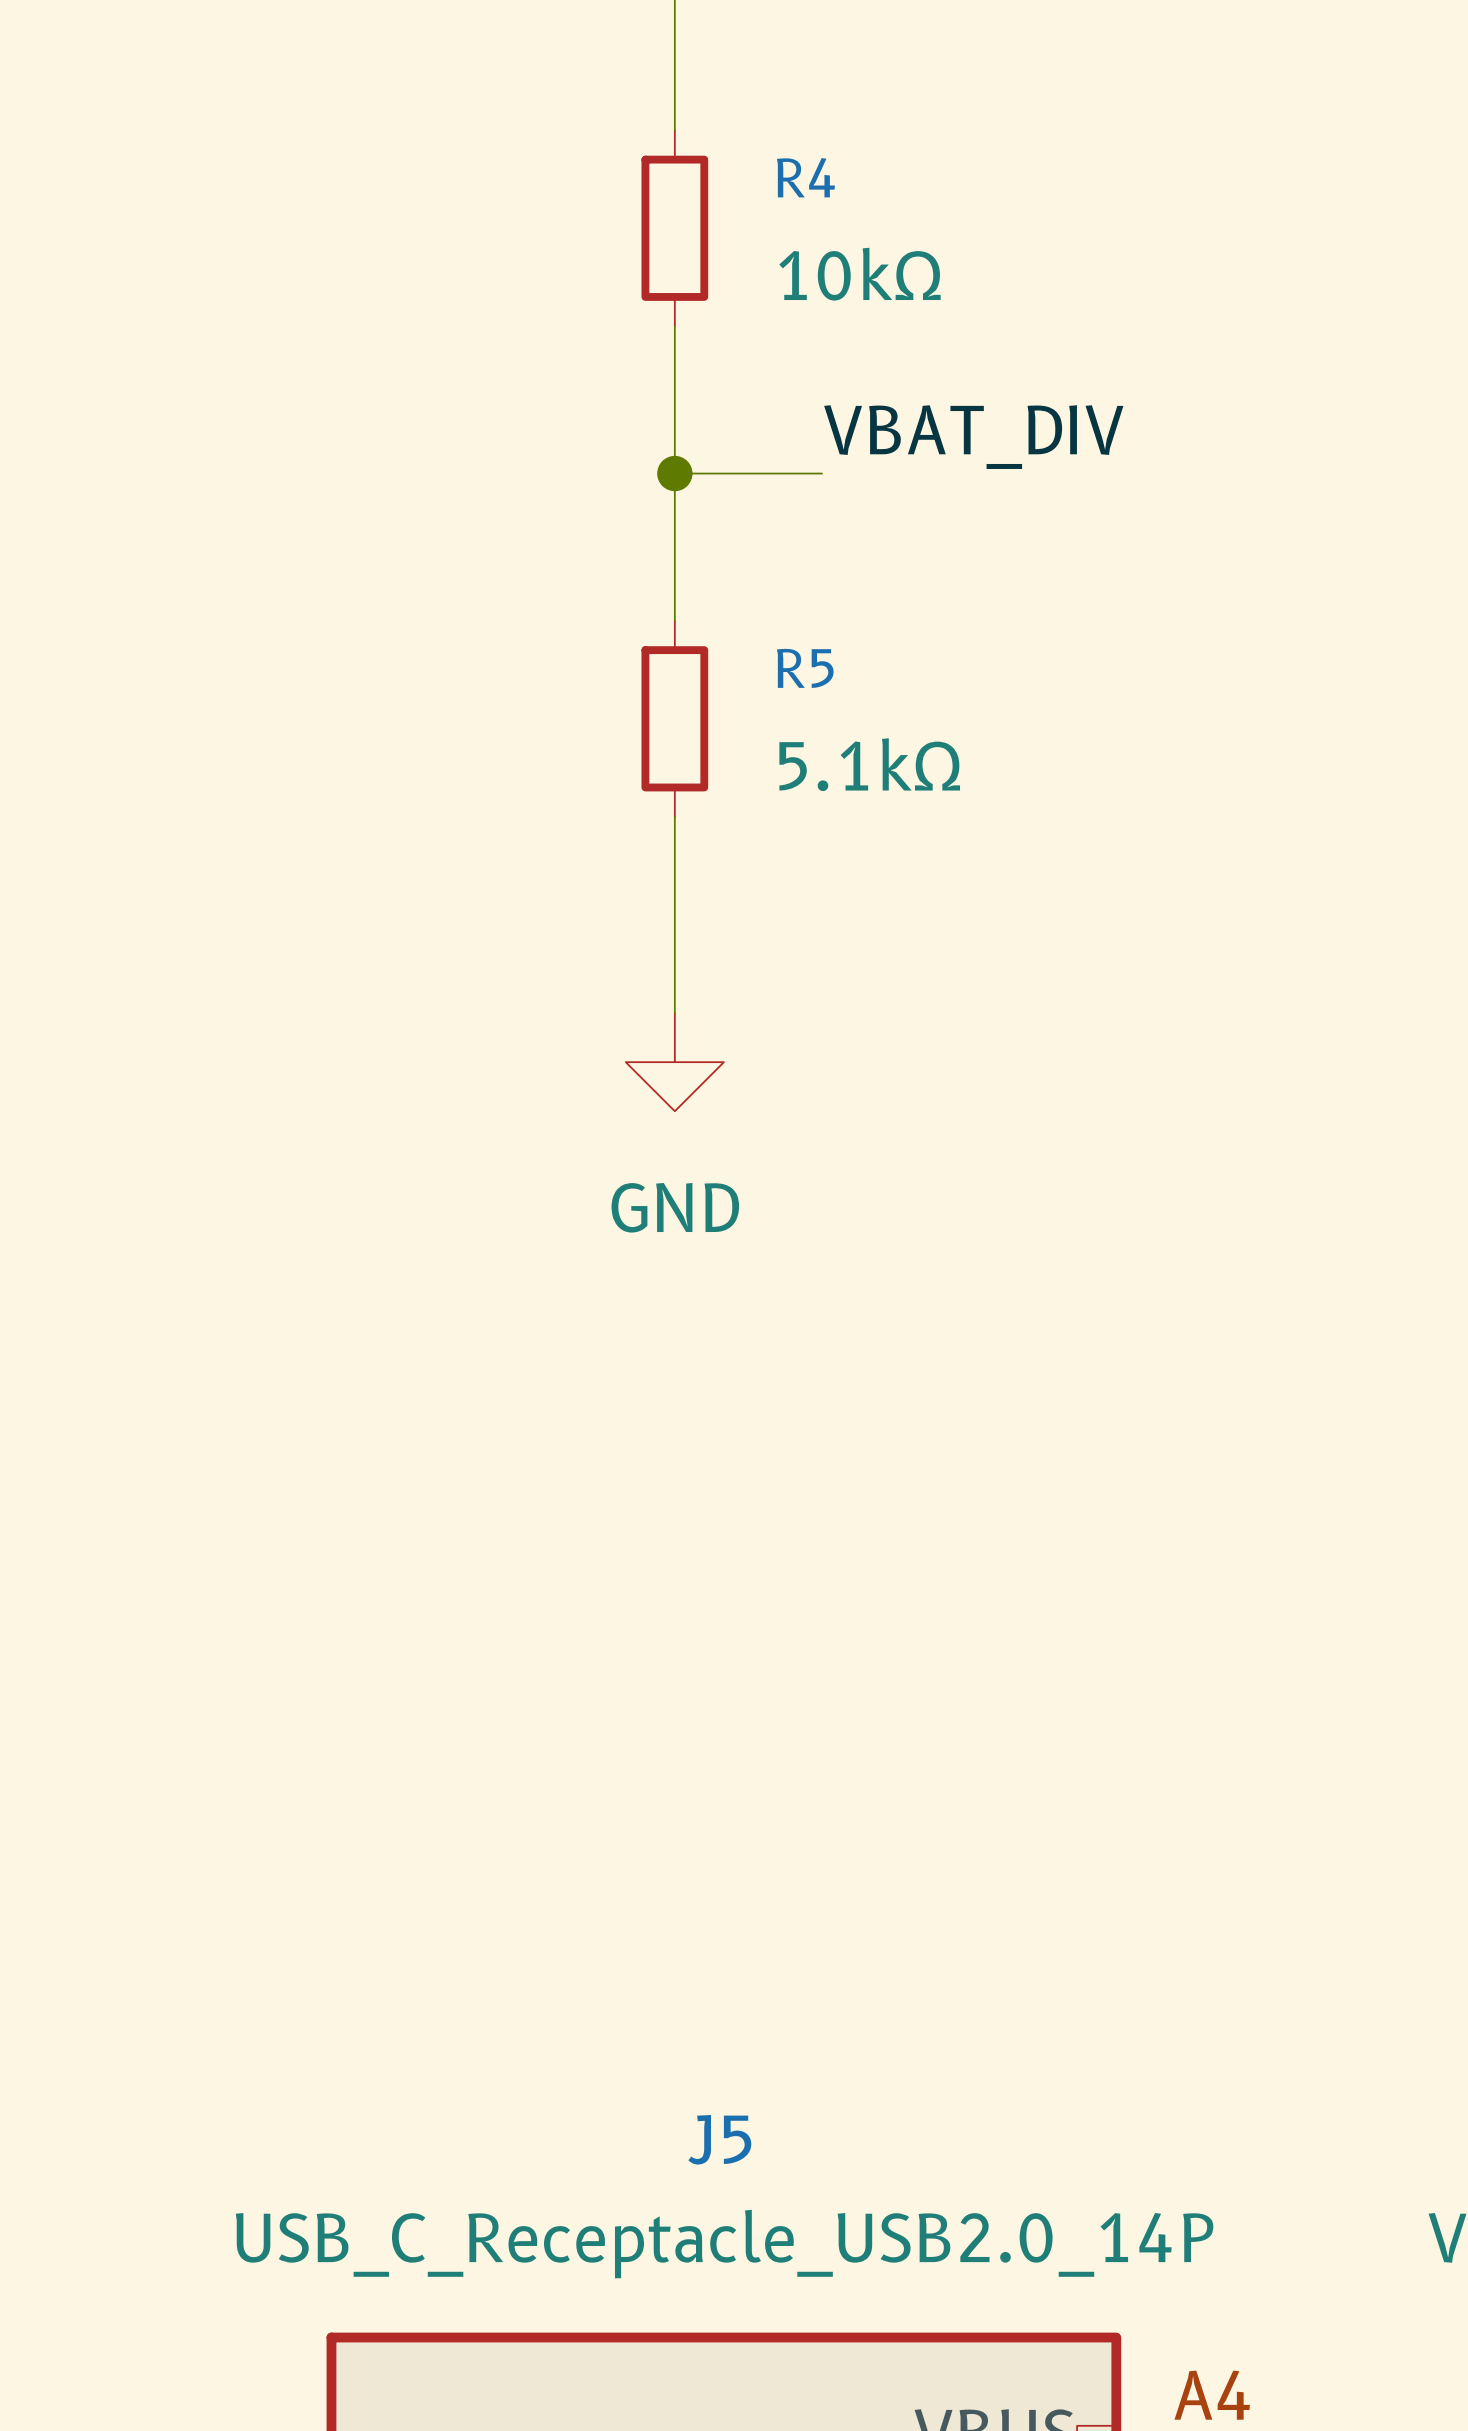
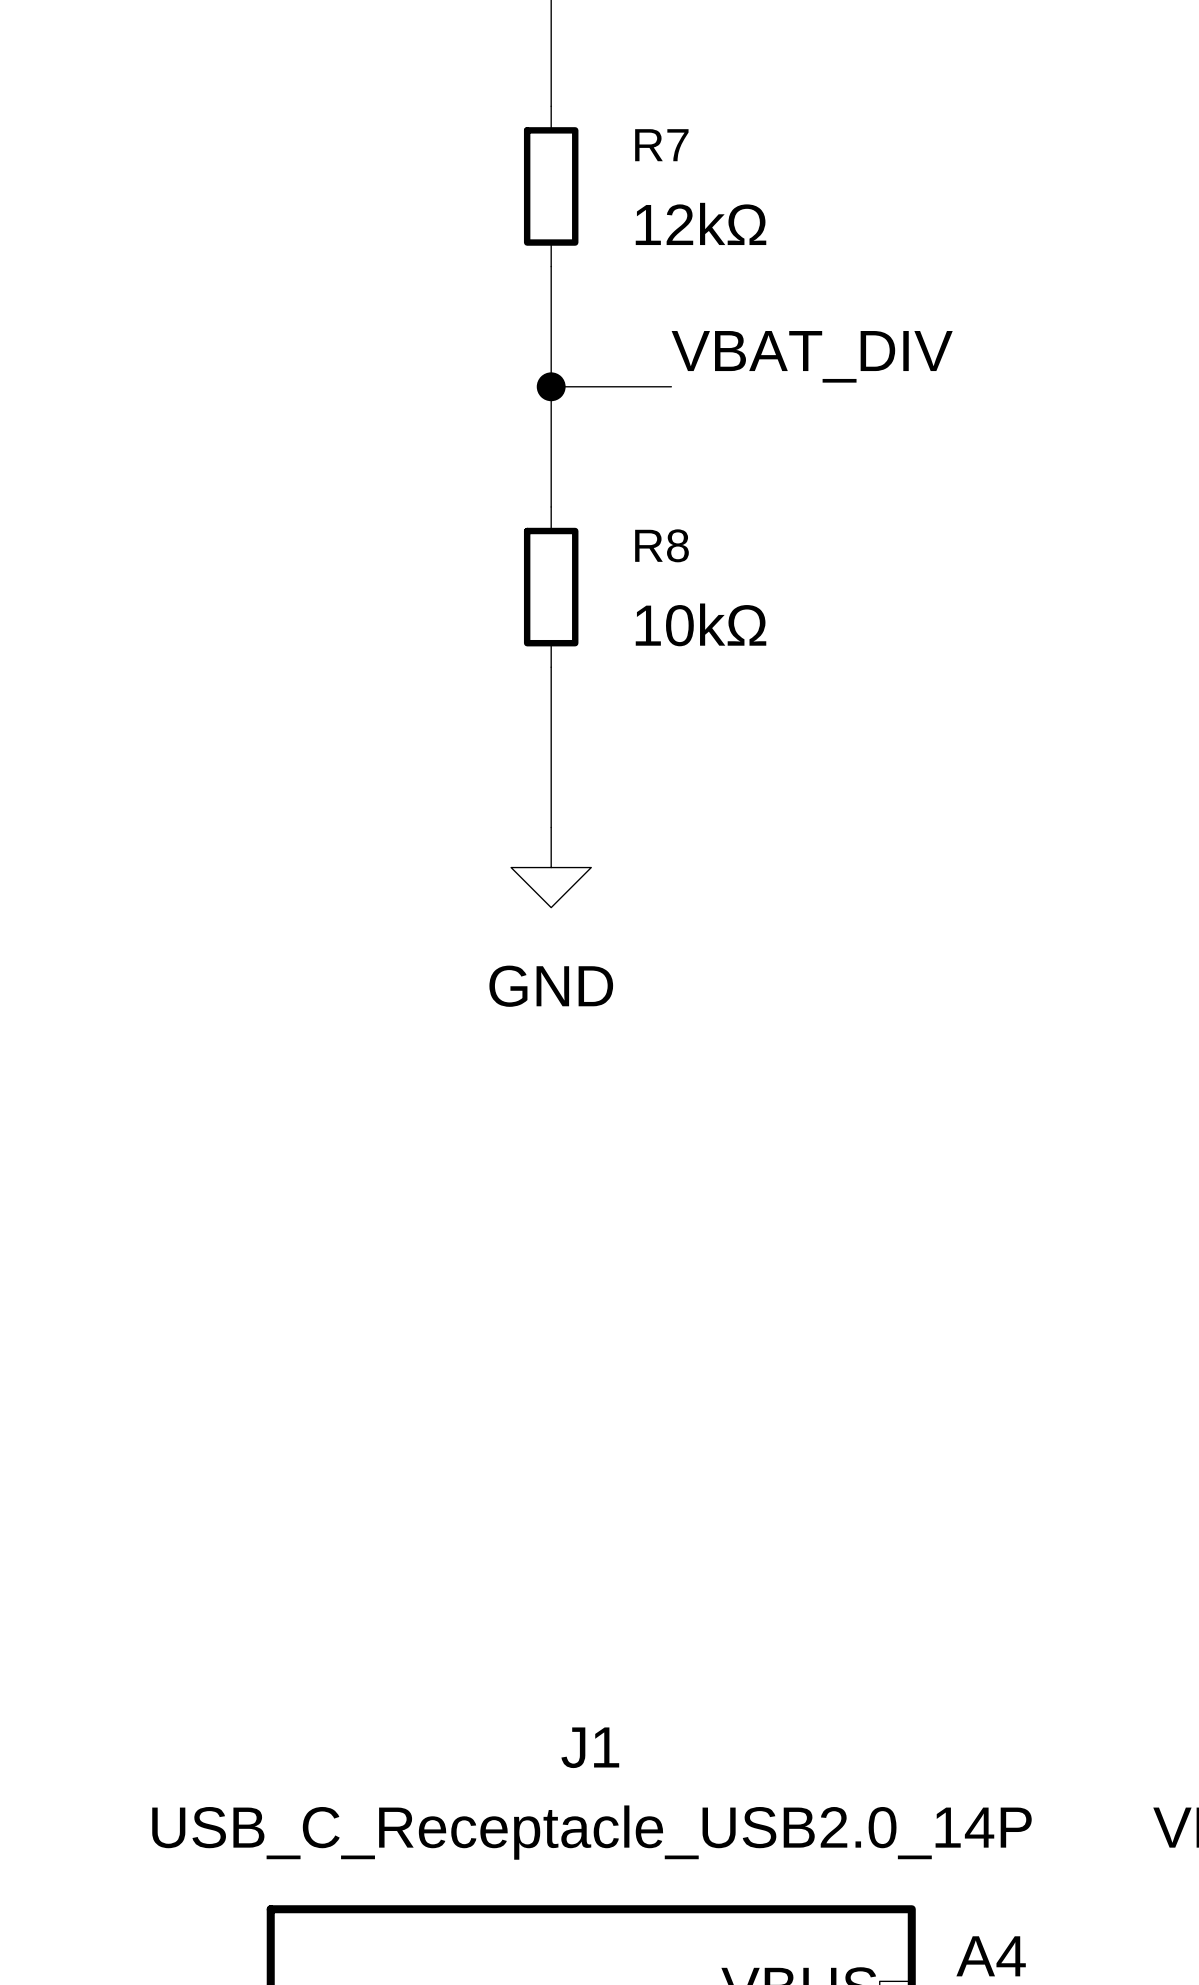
R4 name: R4 (805, 177) -> R7 (661, 145)
R4 value: 10kΩ (859, 274) -> 12kΩ (701, 223)
R5 name: R5 (805, 668) -> R8 (662, 545)
R5 value: 5.1kΩ (869, 764) -> 10kΩ (701, 624)
J5 name: J5 (719, 2139) -> J1 (590, 1747)

